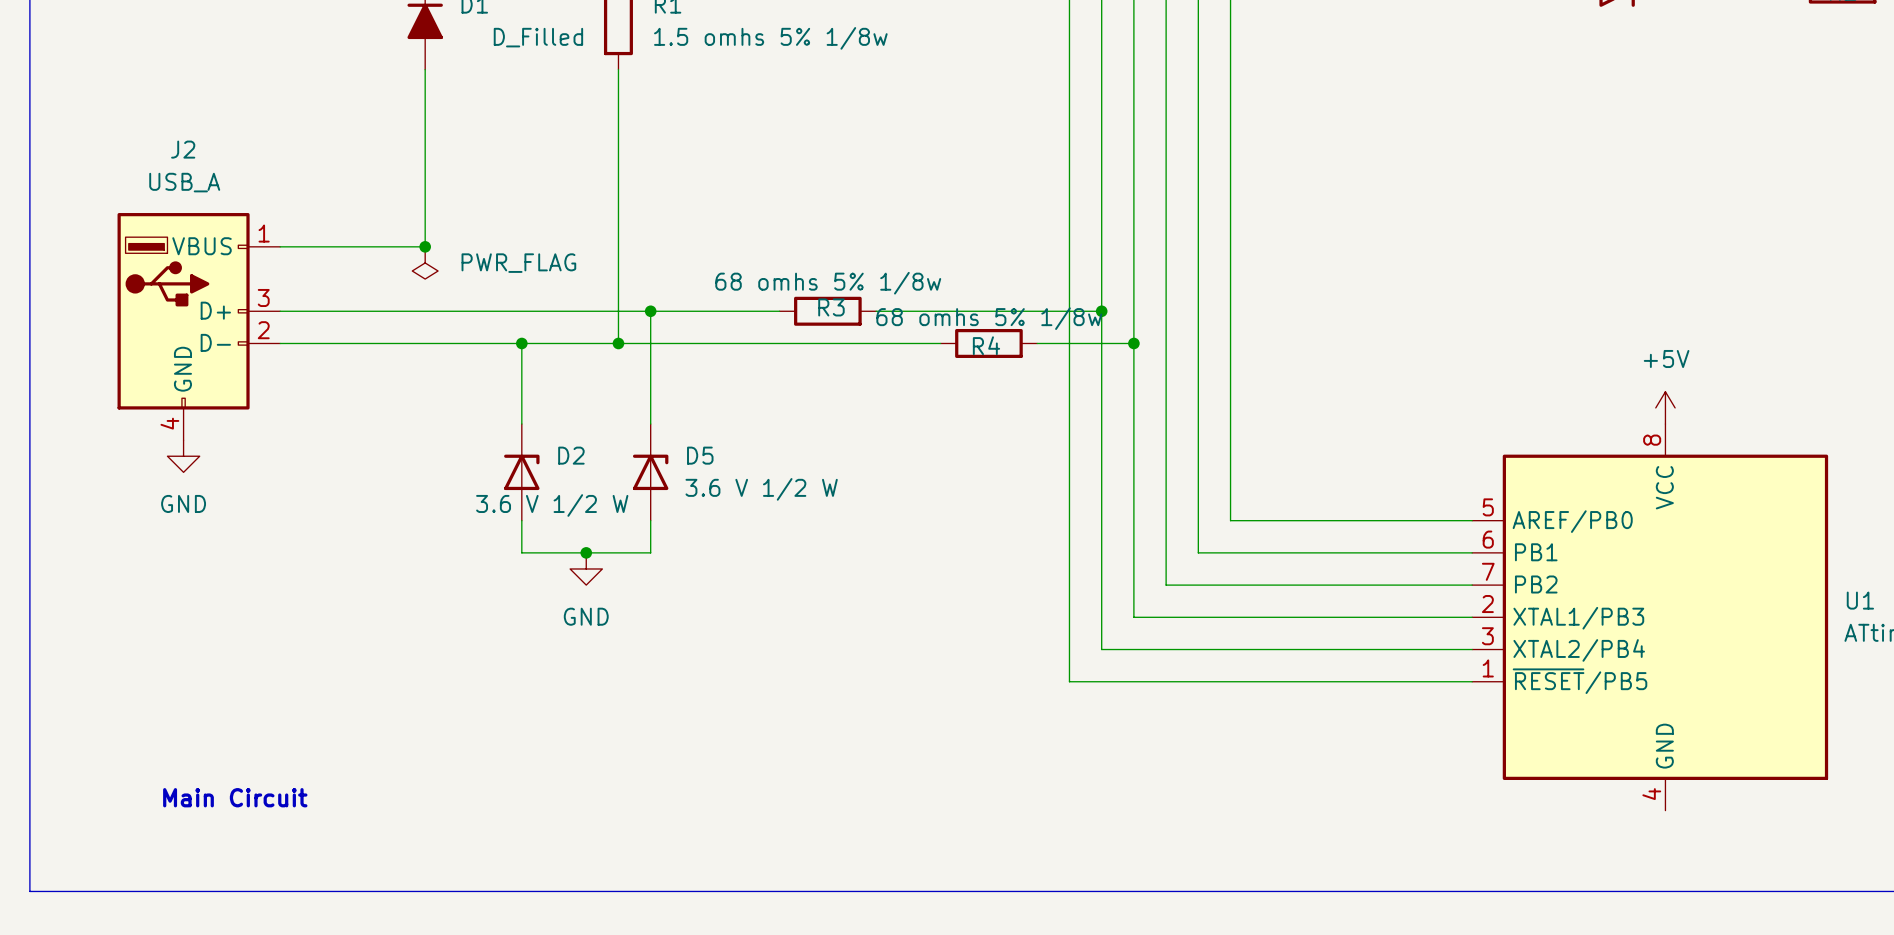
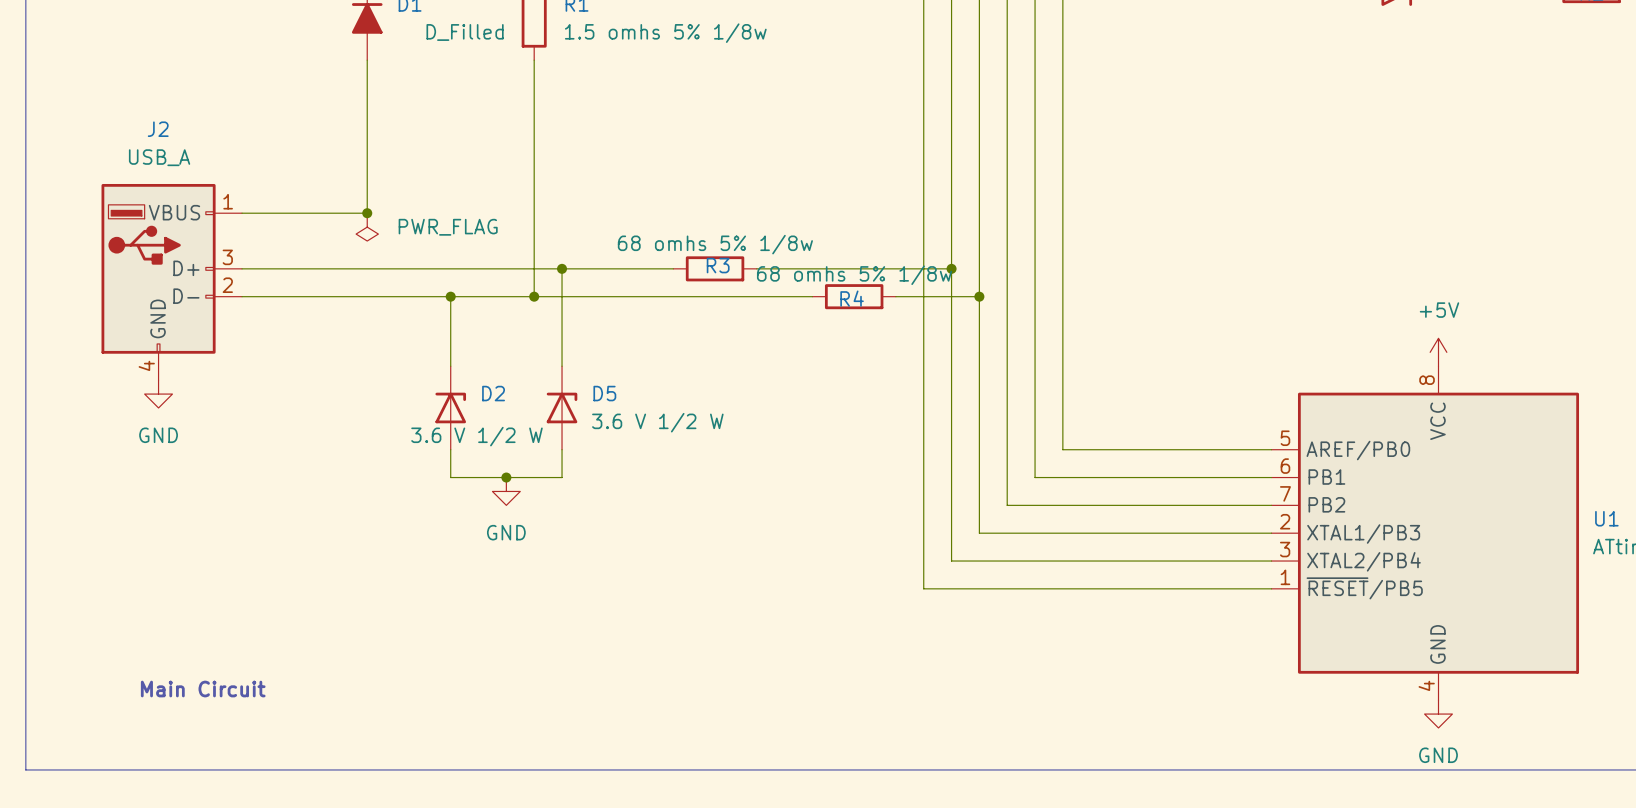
power symbol: none -> GND (1438, 714)

